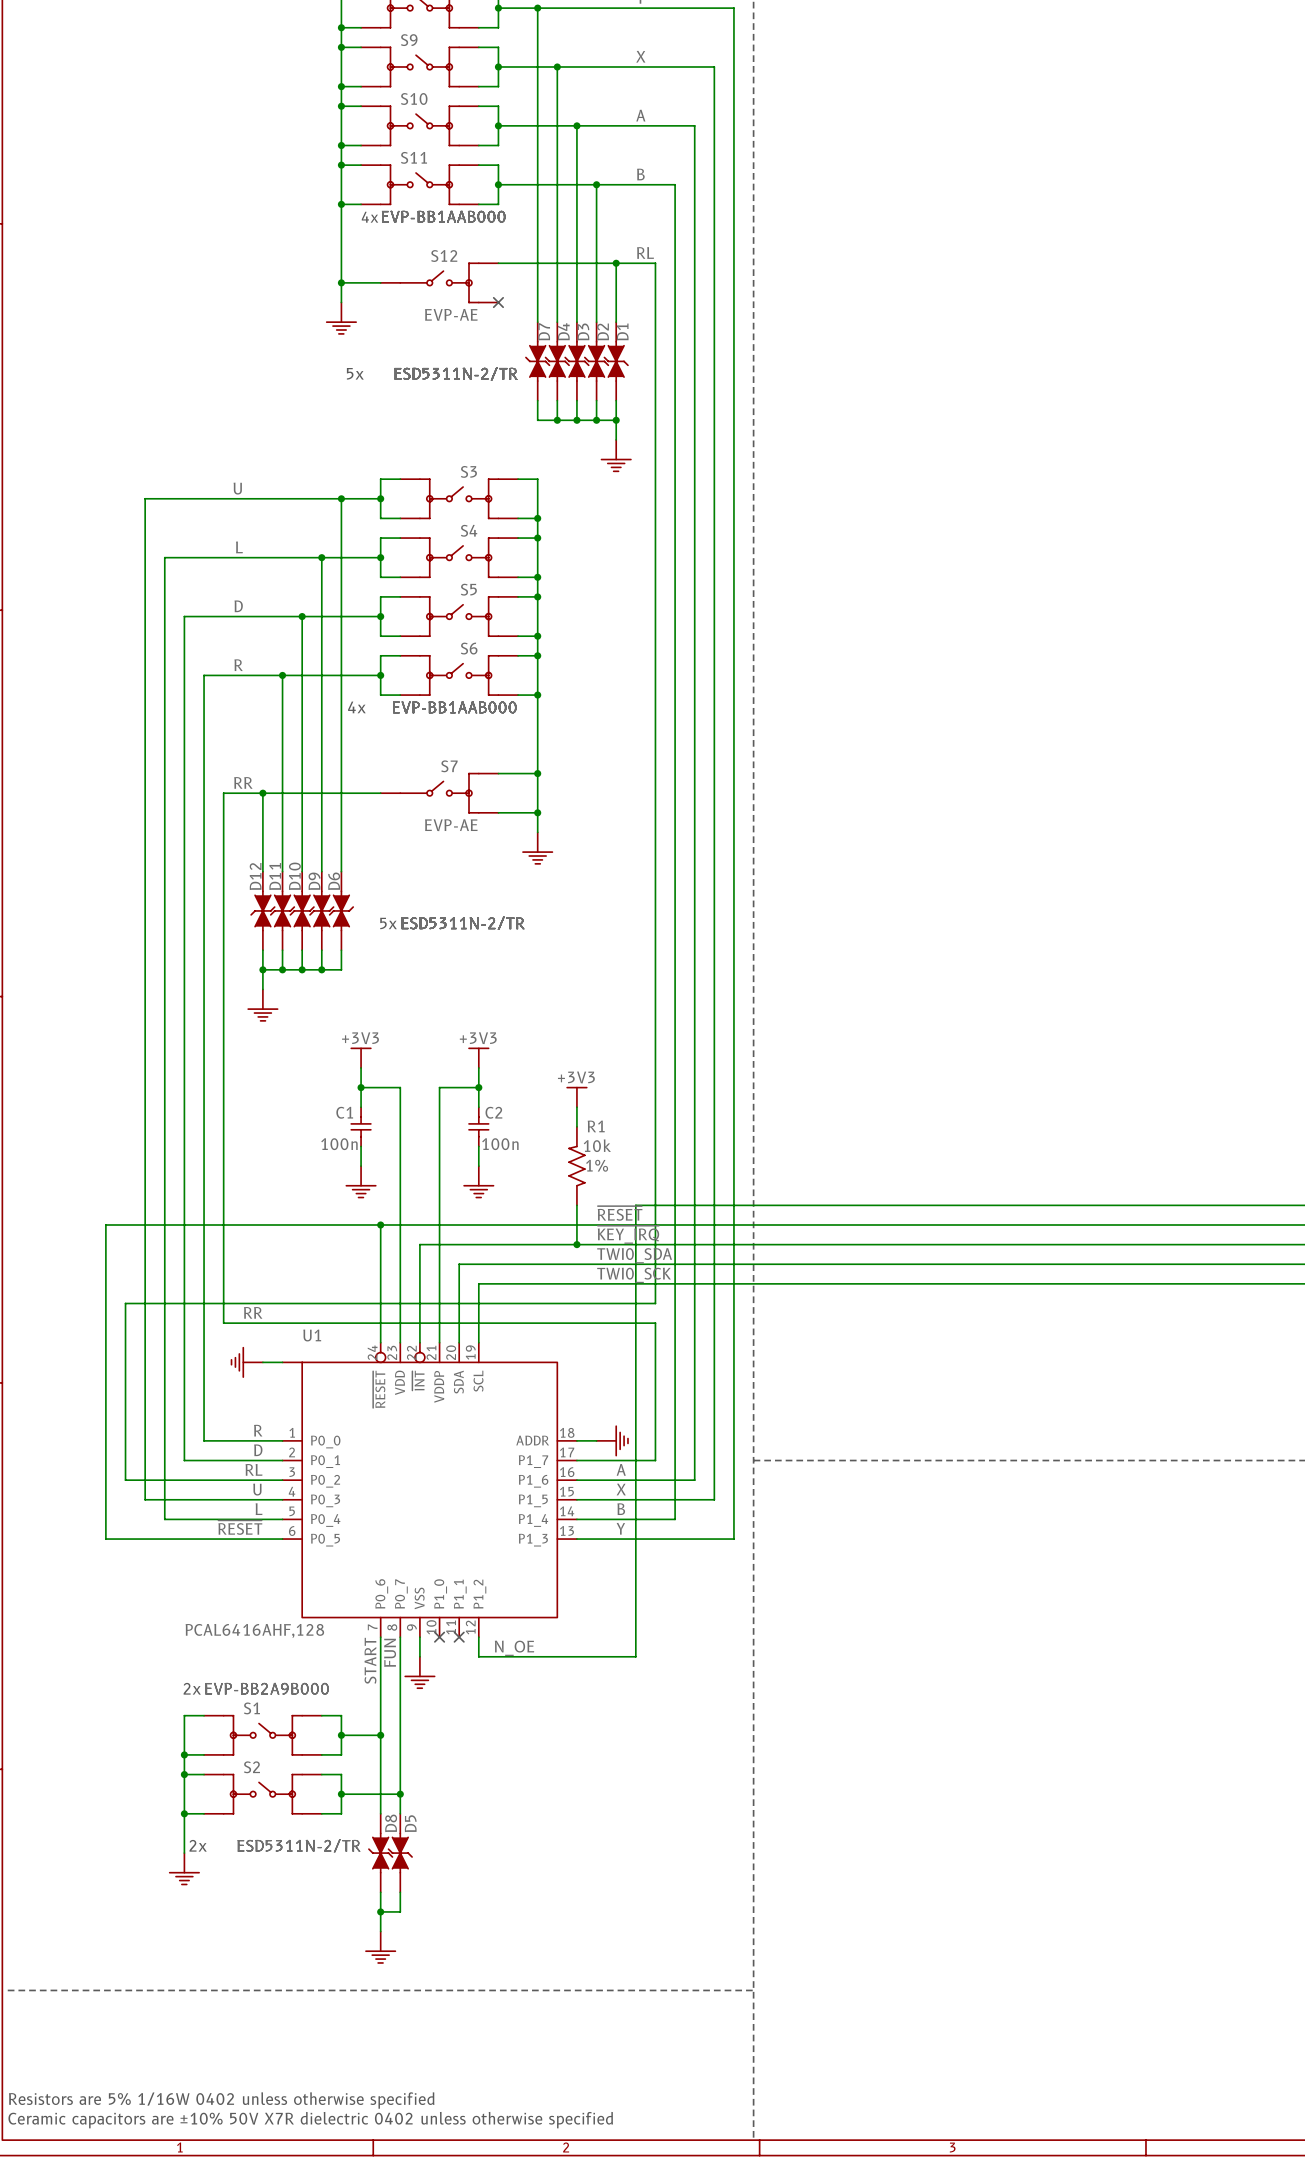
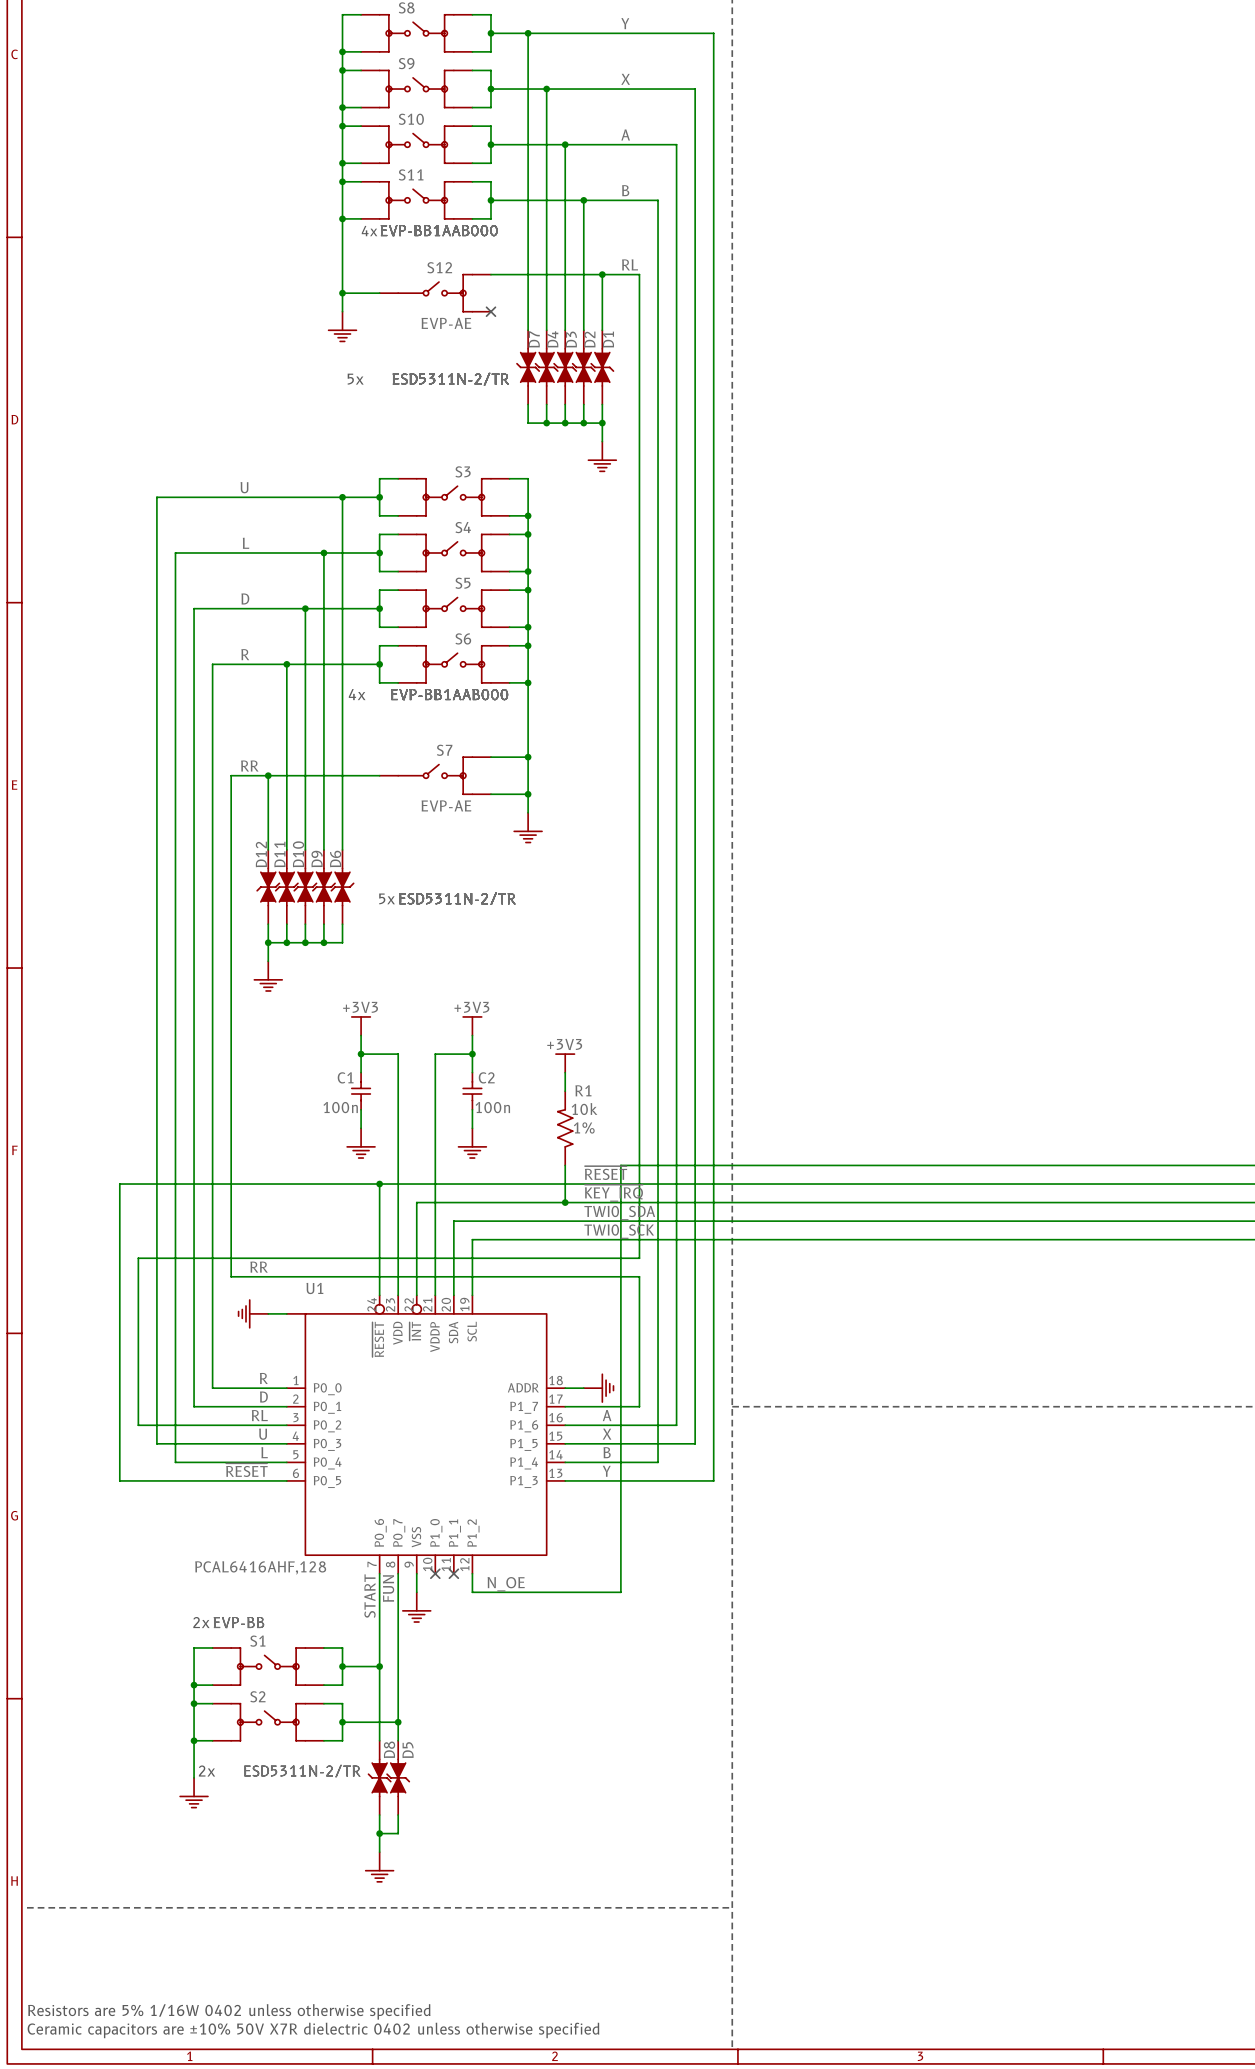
S1 value: EVP-BB2A9B000 (267, 1688) -> EVP-BB (238, 1622)
S2 value: EVP-BB2A9B000 (267, 1688) -> EVP-BB (238, 1622)

